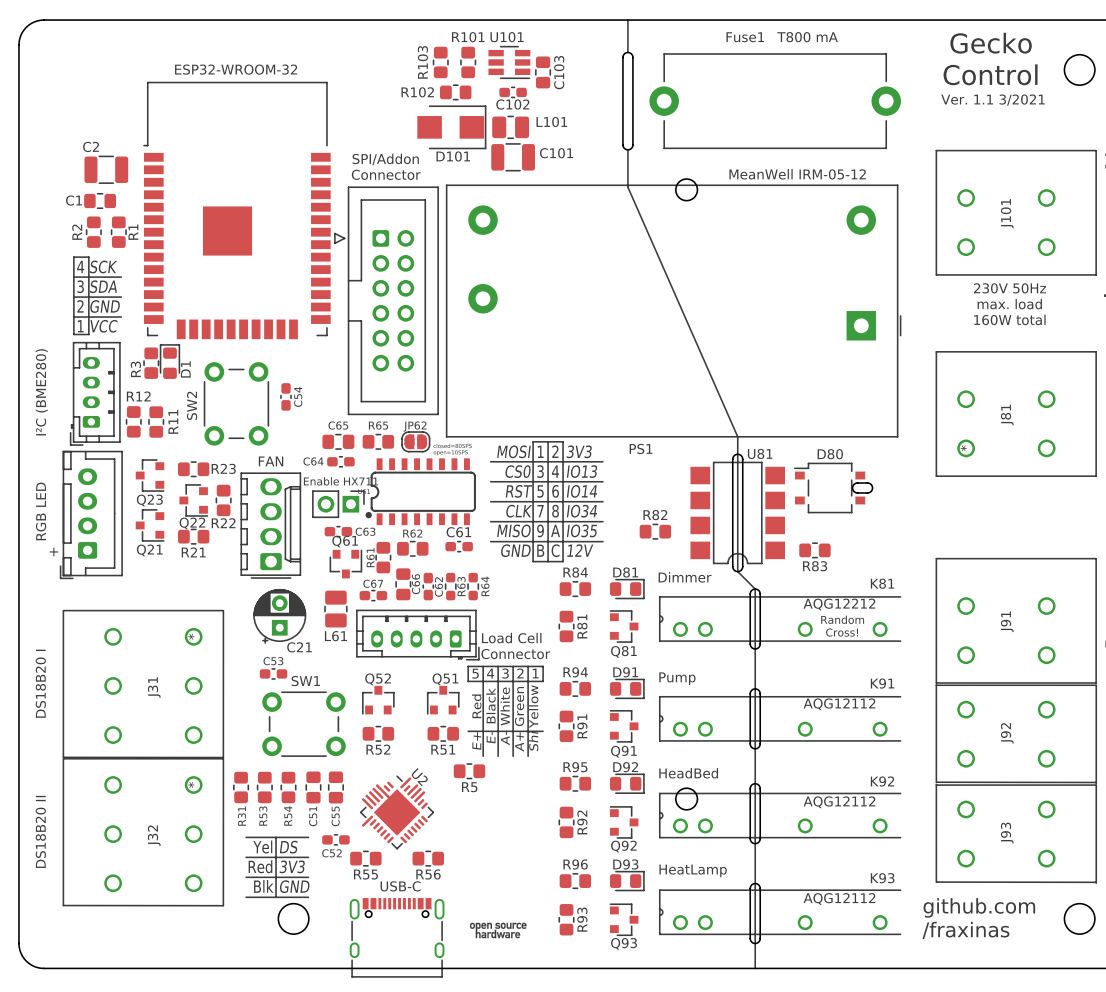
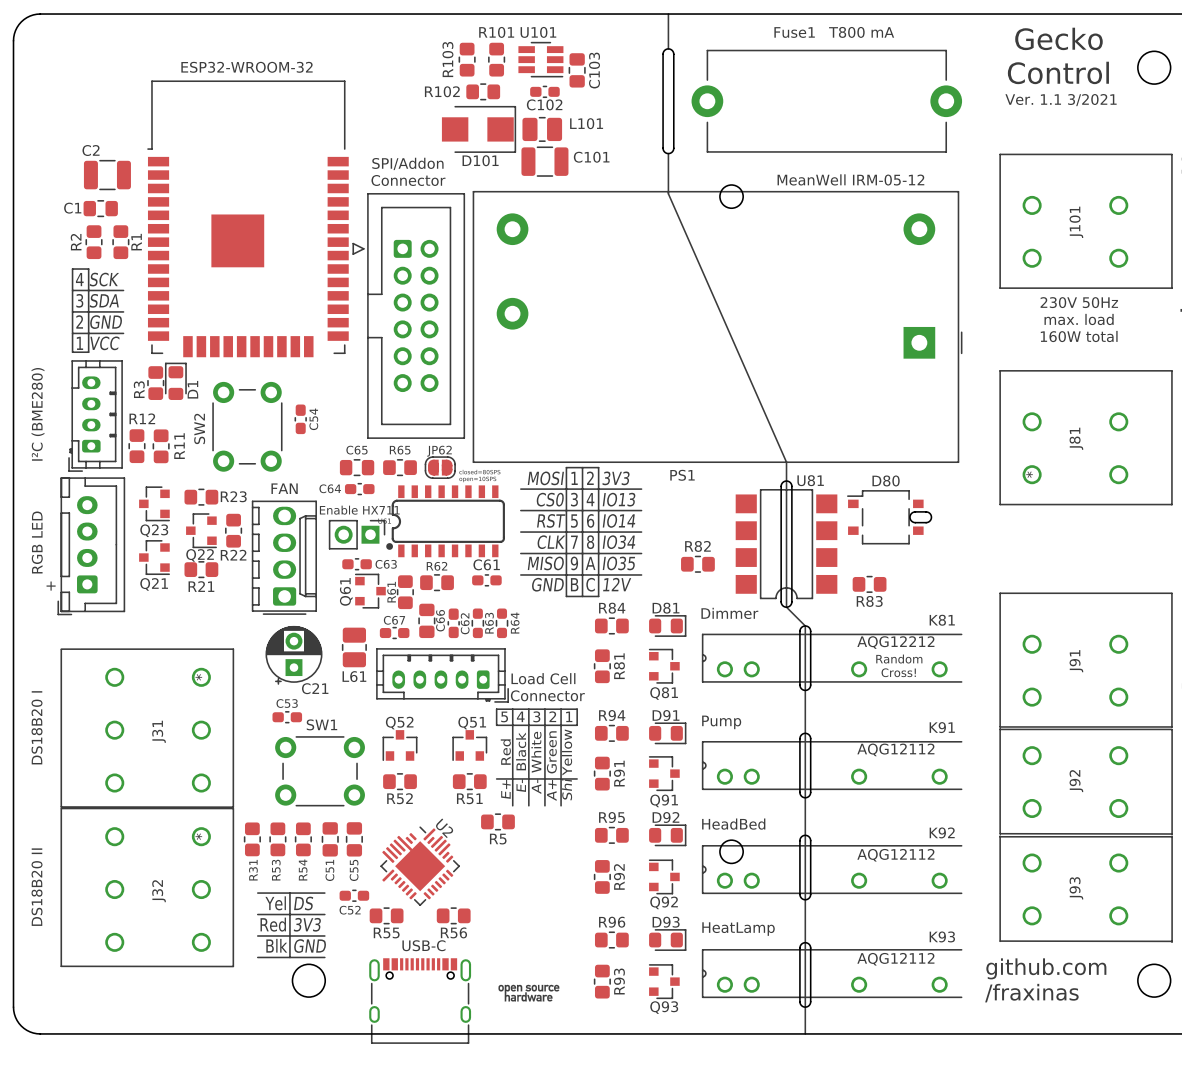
Q61 rotation: 0° (345, 564) -> 90° counterclockwise (370, 591)

